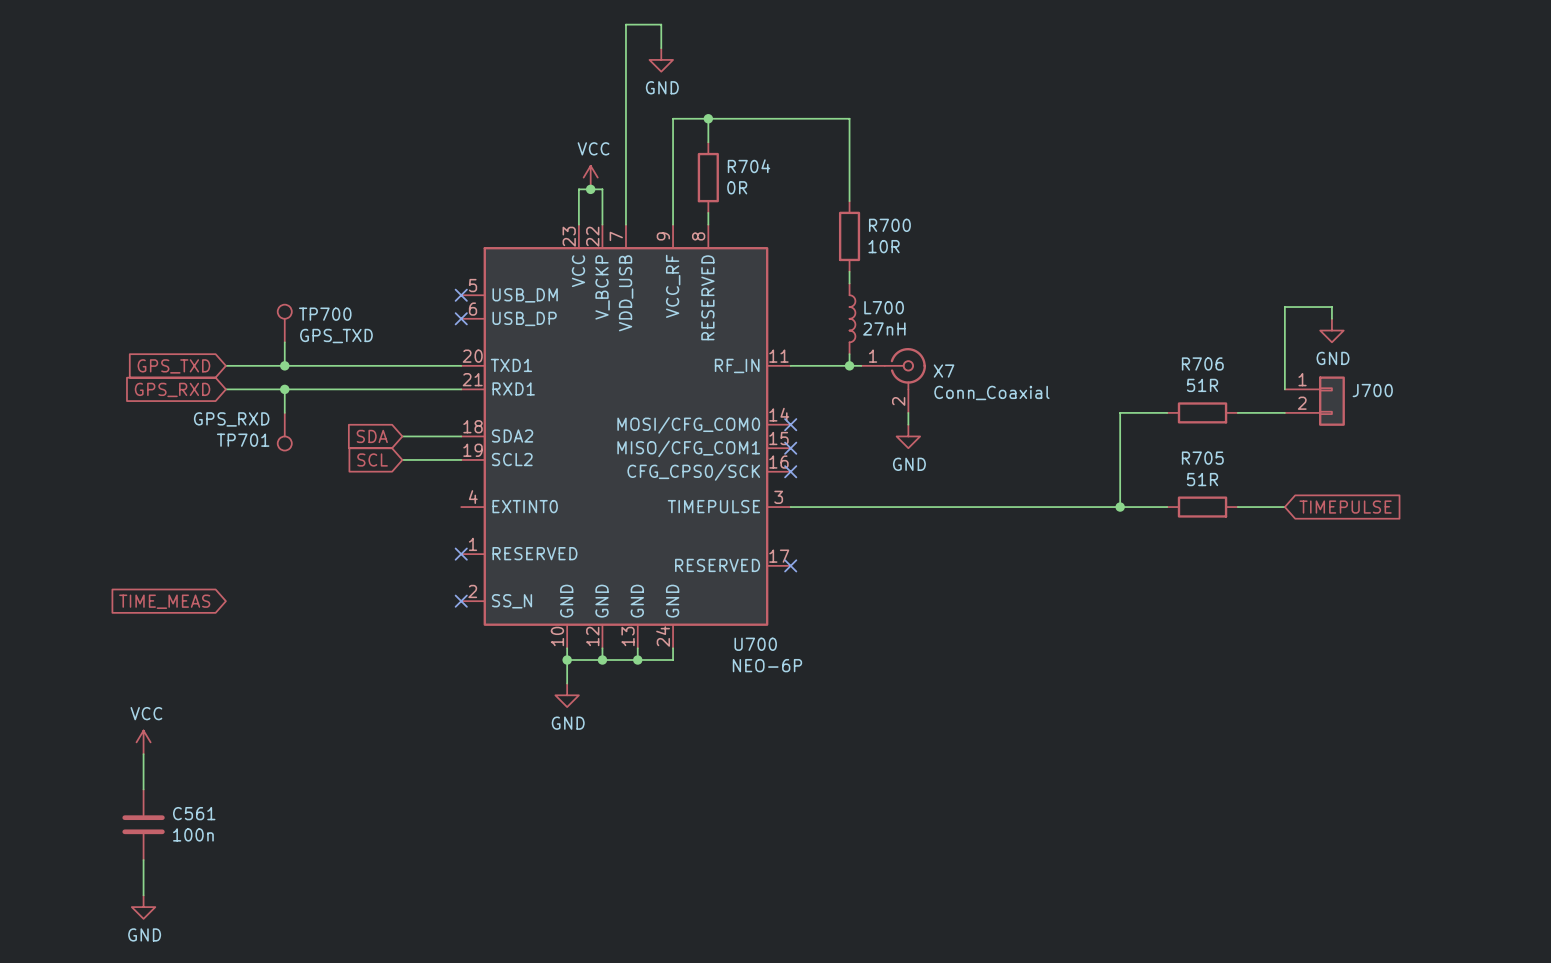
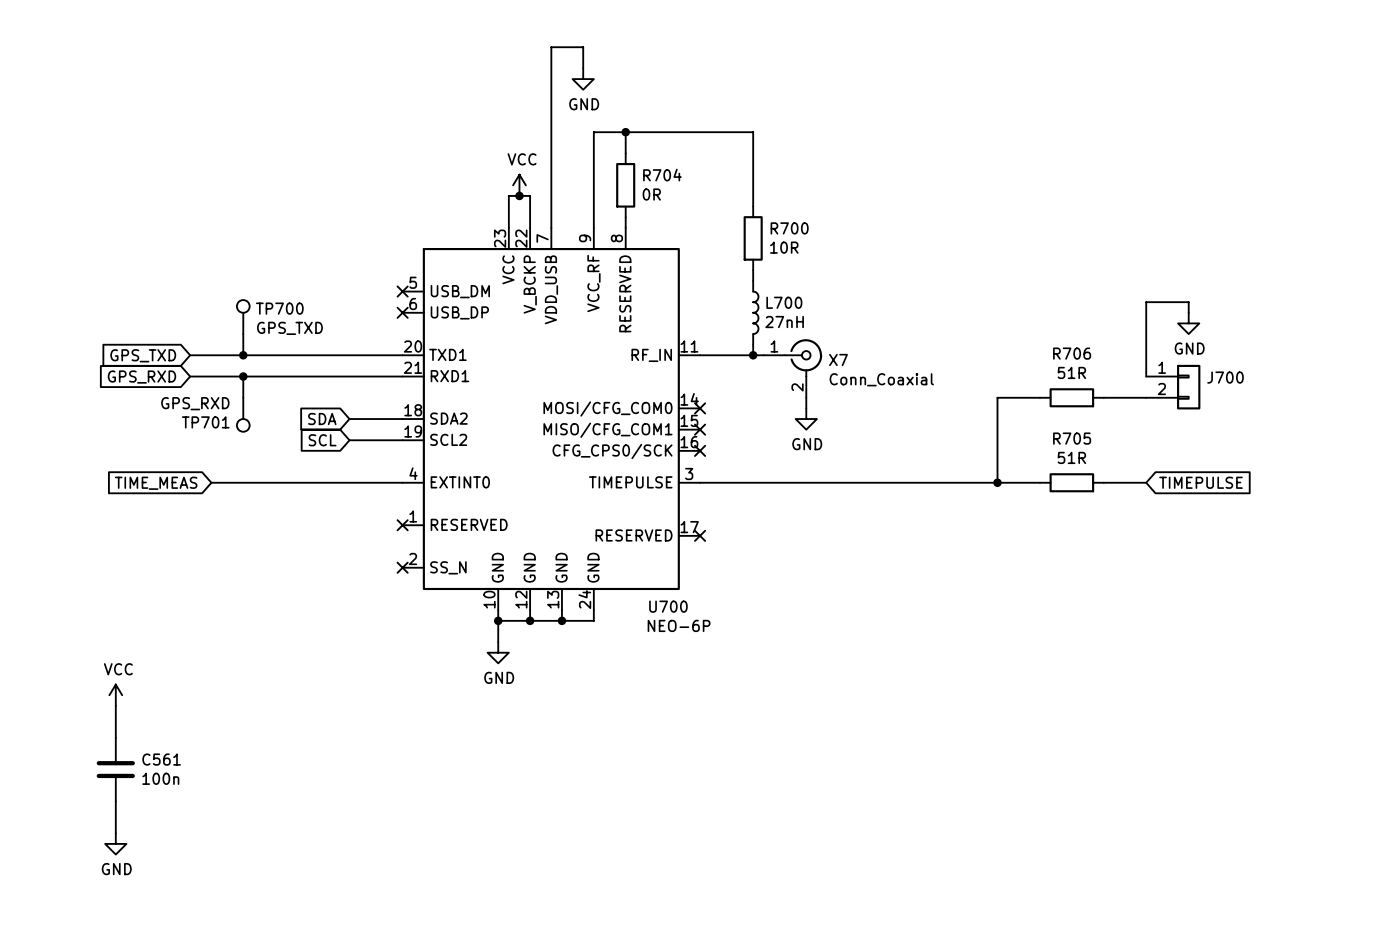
wire: none -> (211, 482) (402, 482)
global label position: TIME_MEAS (164, 601) -> TIME_MEAS (156, 483)

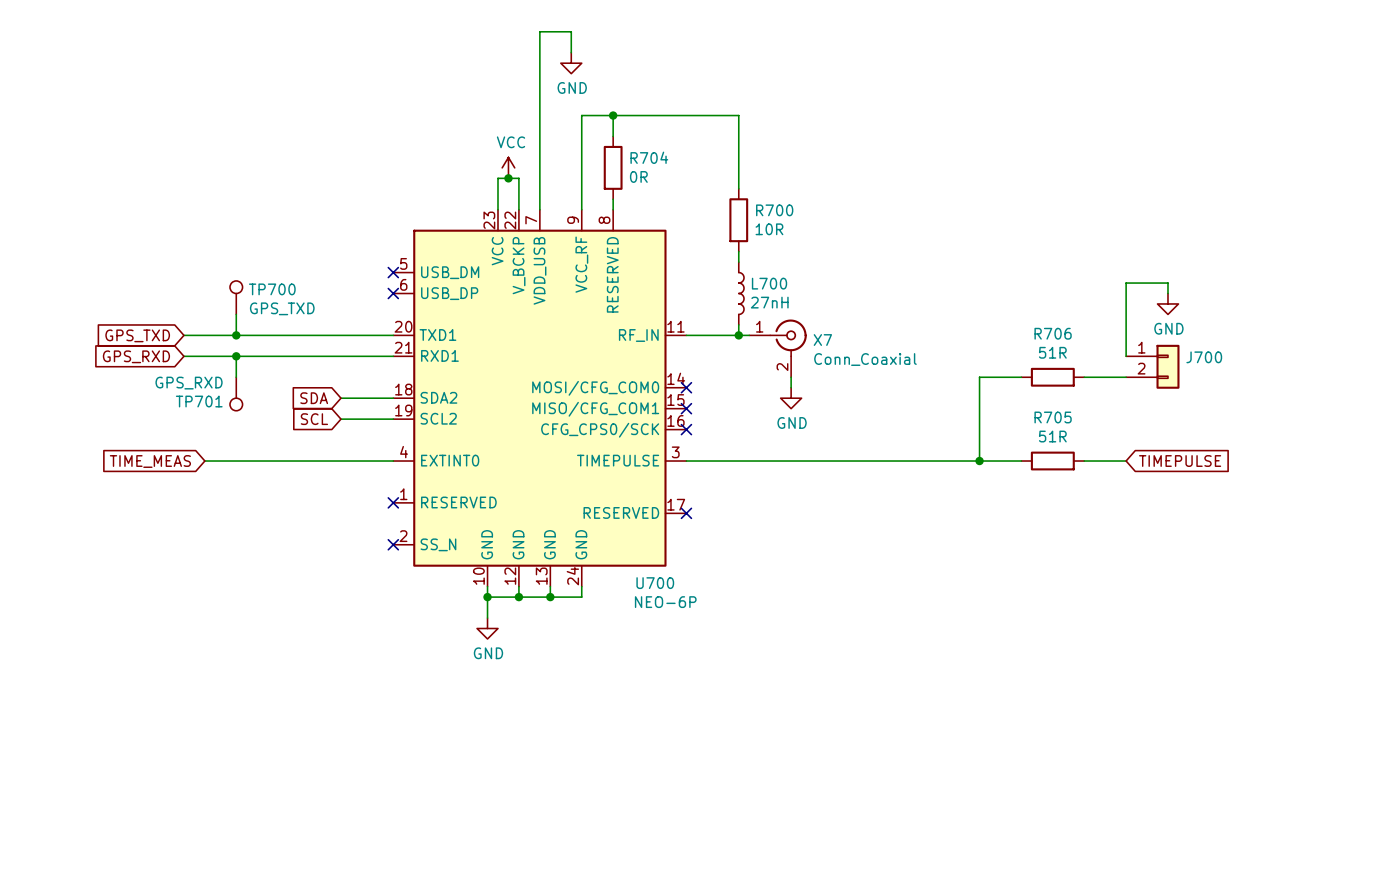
power symbol: VCC (115, 695) -> none
wire: (115, 705) (115, 737) -> none
C561: 100n (115, 769) -> none
wire: (115, 801) (115, 833) -> none
power symbol: GND (115, 843) -> none

